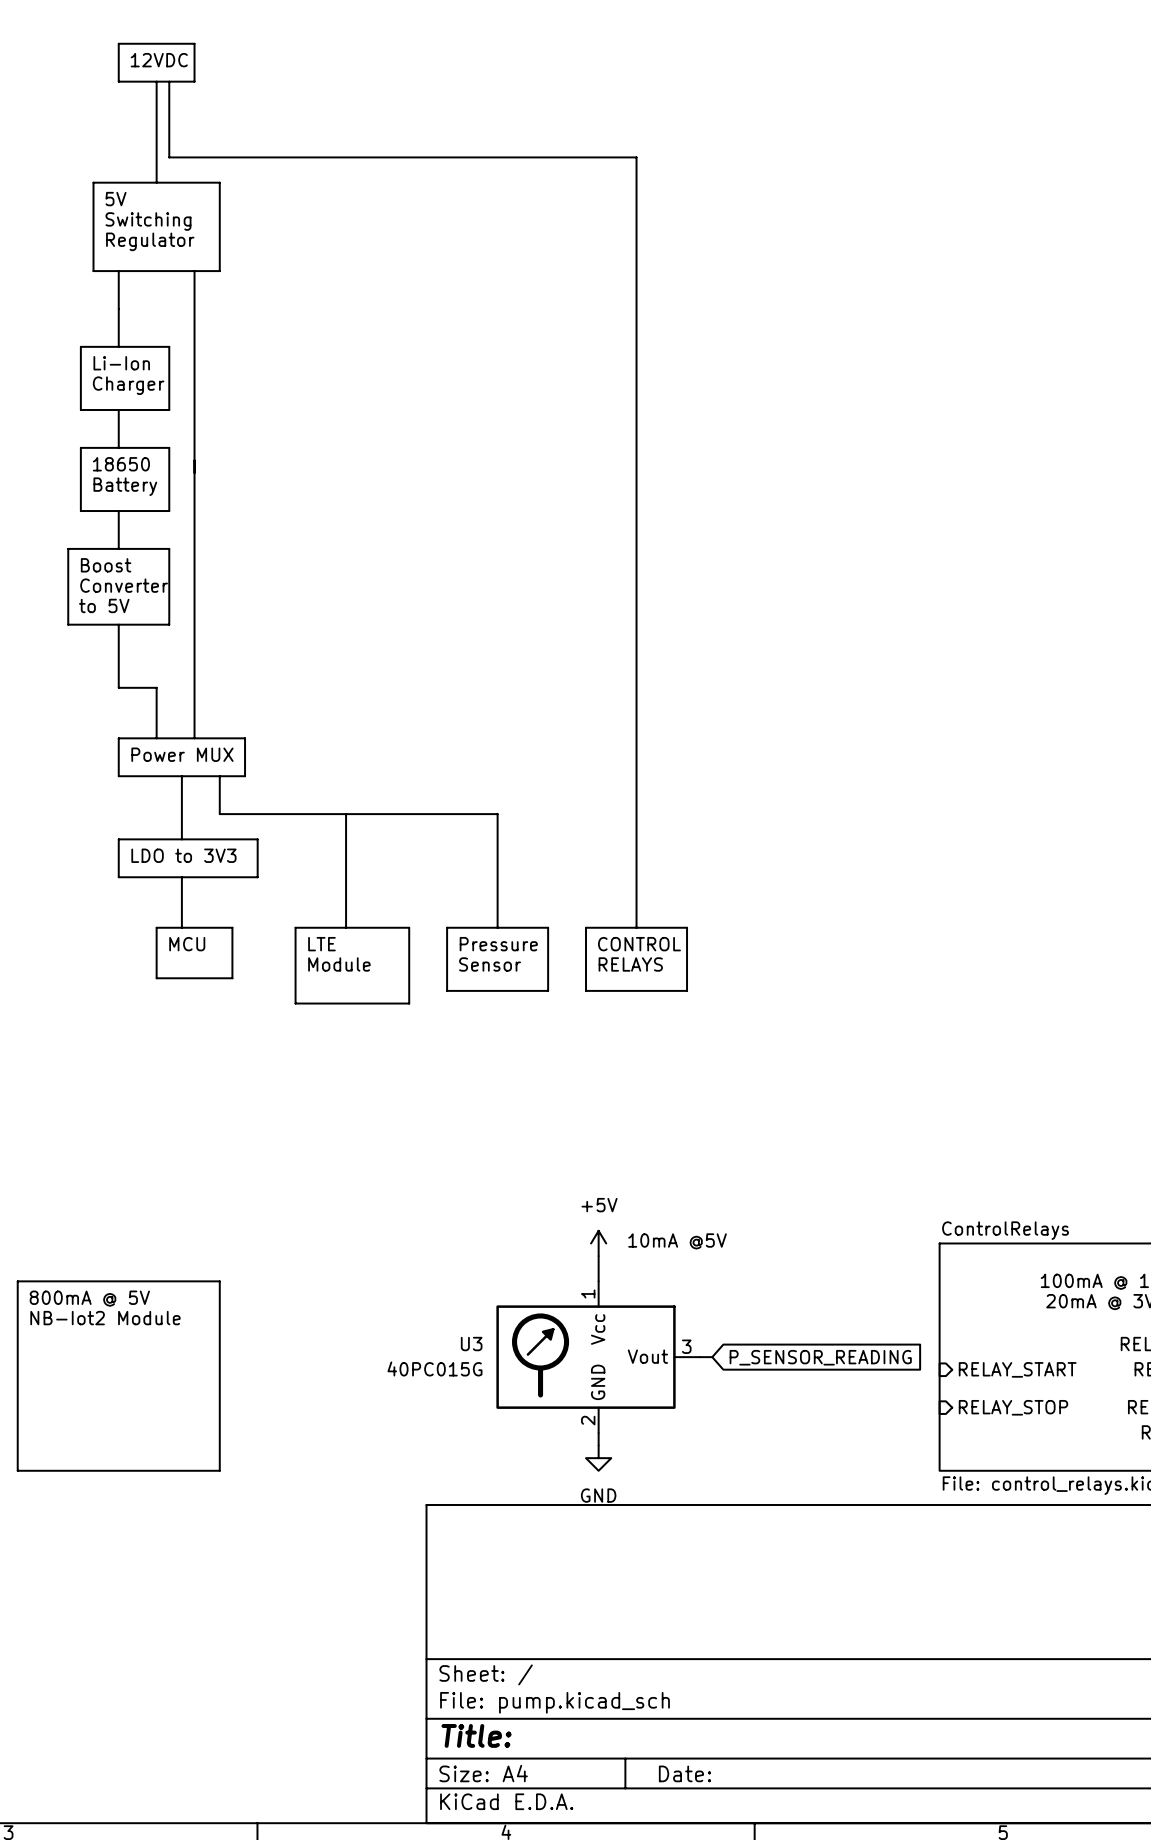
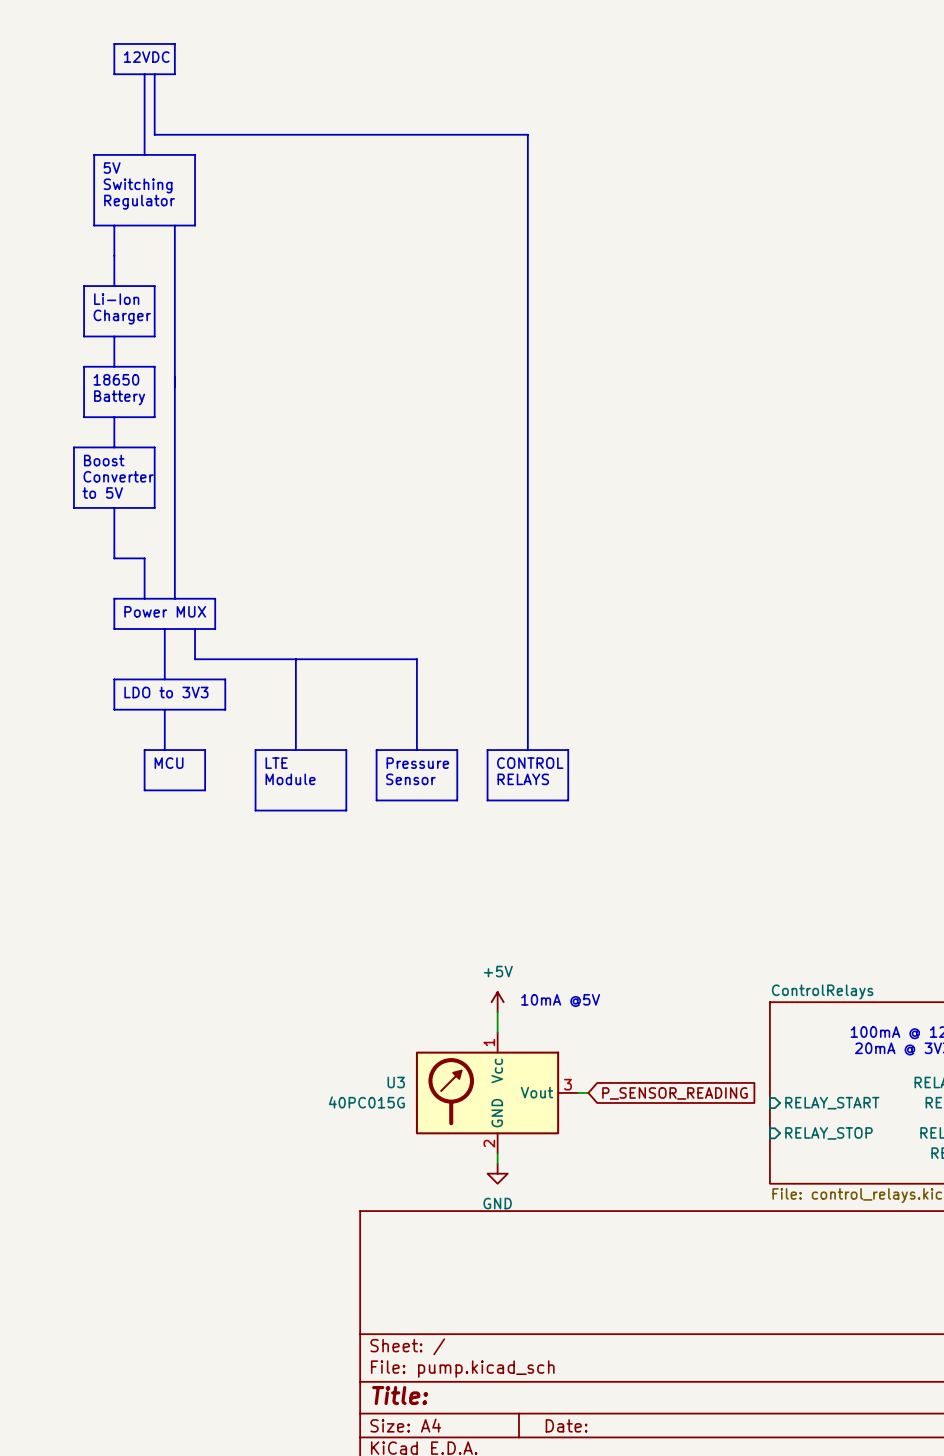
line: (17, 1281) (219, 1281) (219, 1470) (17, 1470) (17, 1281) -> none
text: 800mA @ 5V (89, 1298) -> none
text: NB-Iot2 Module (105, 1318) -> none

